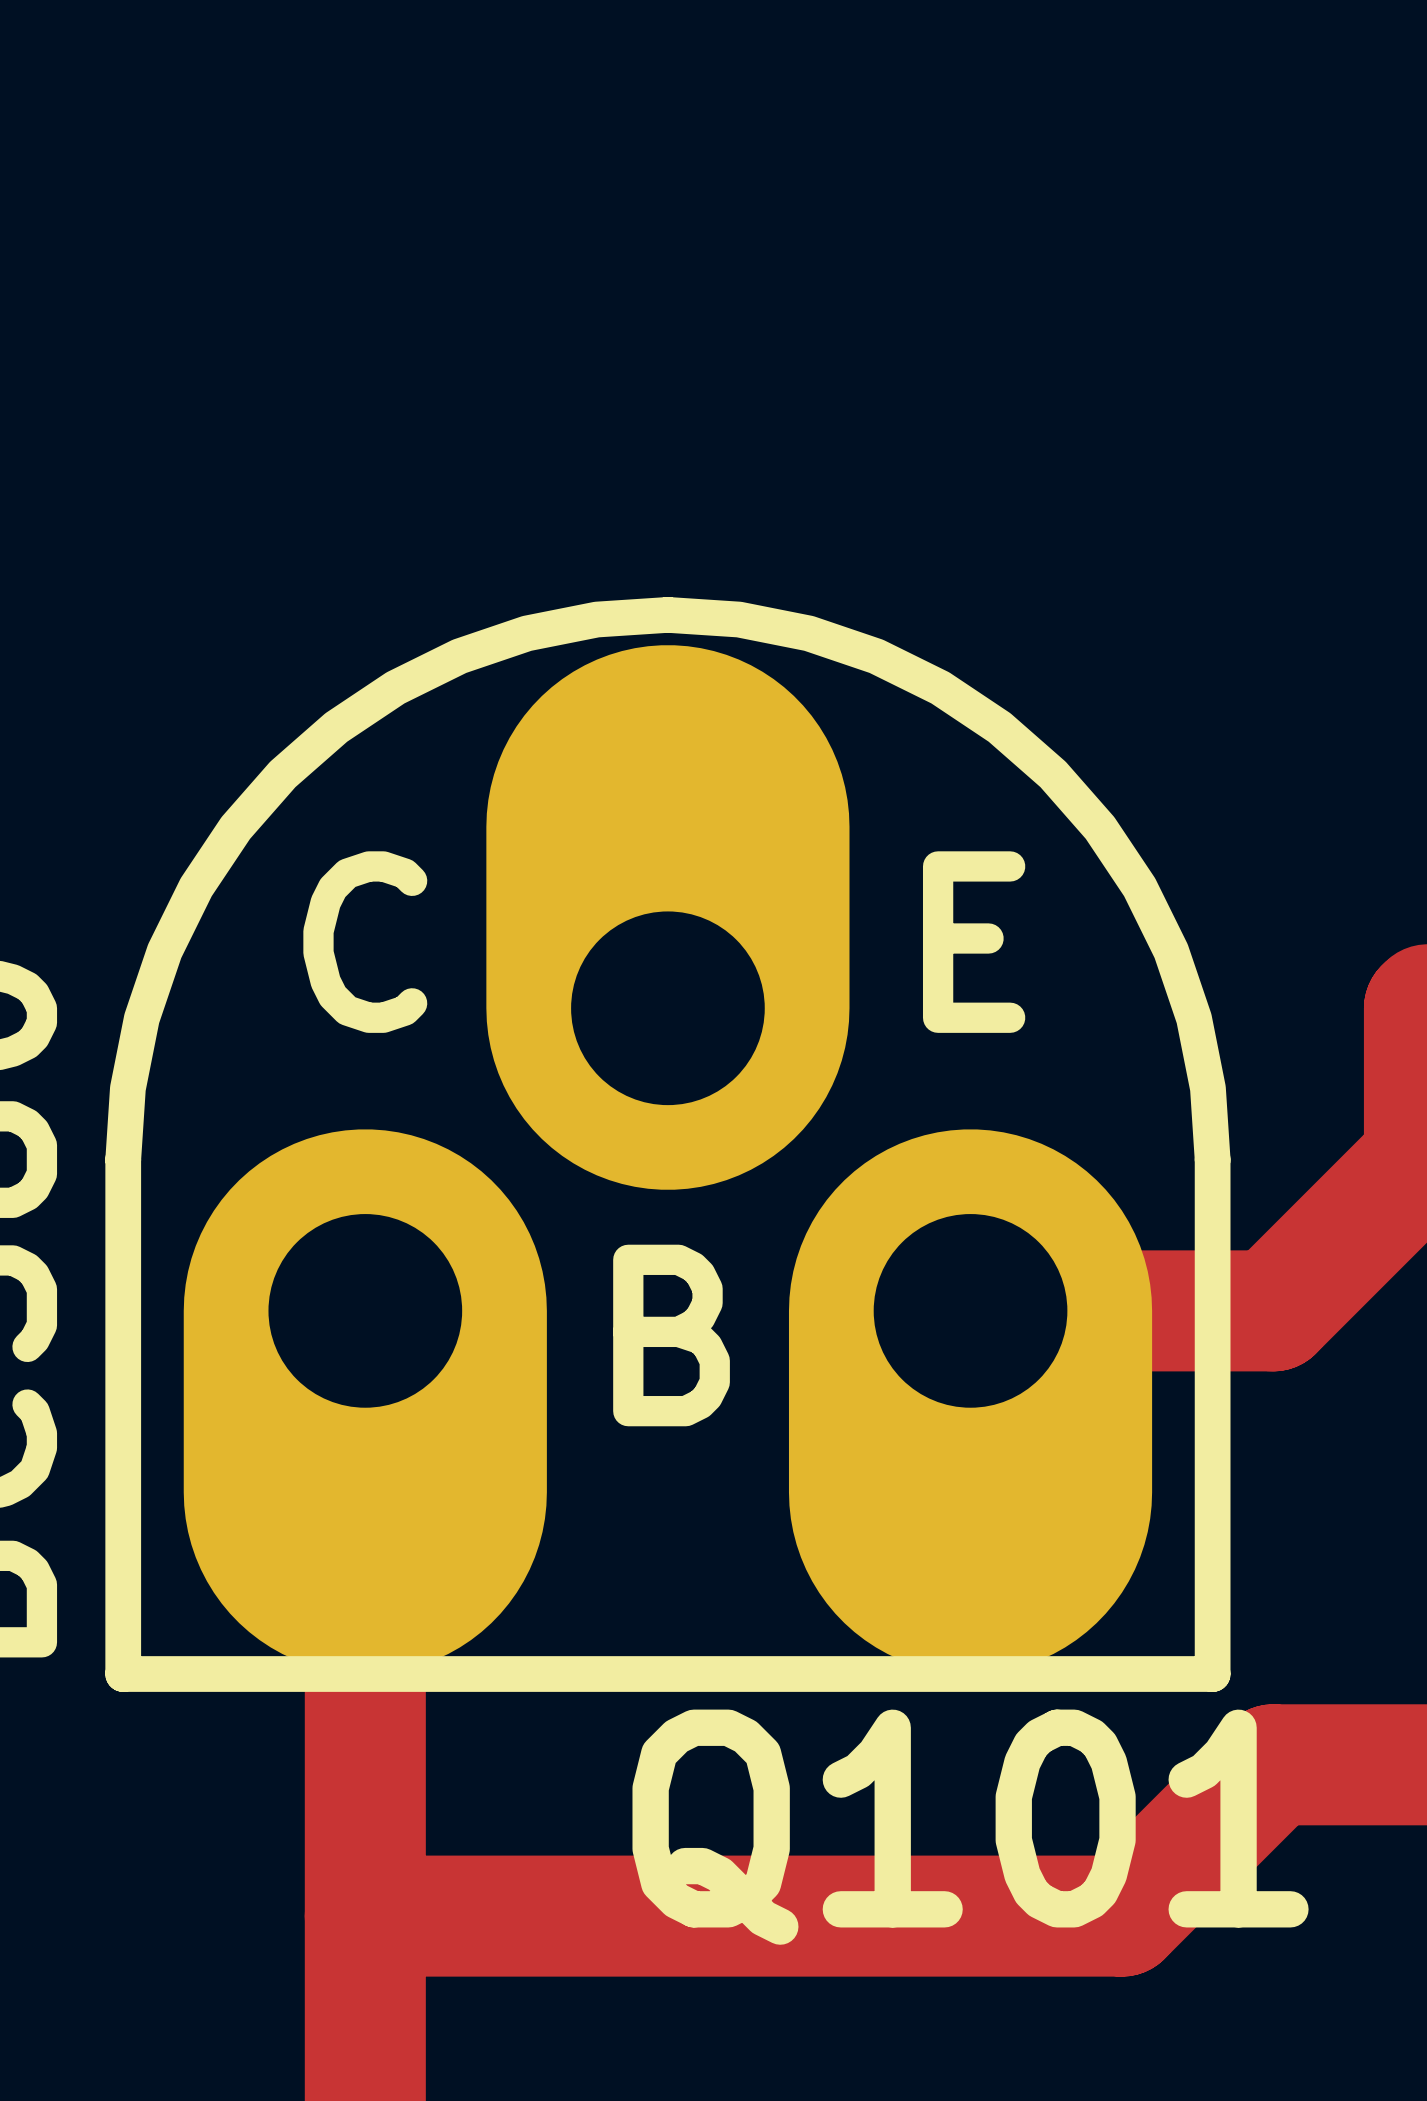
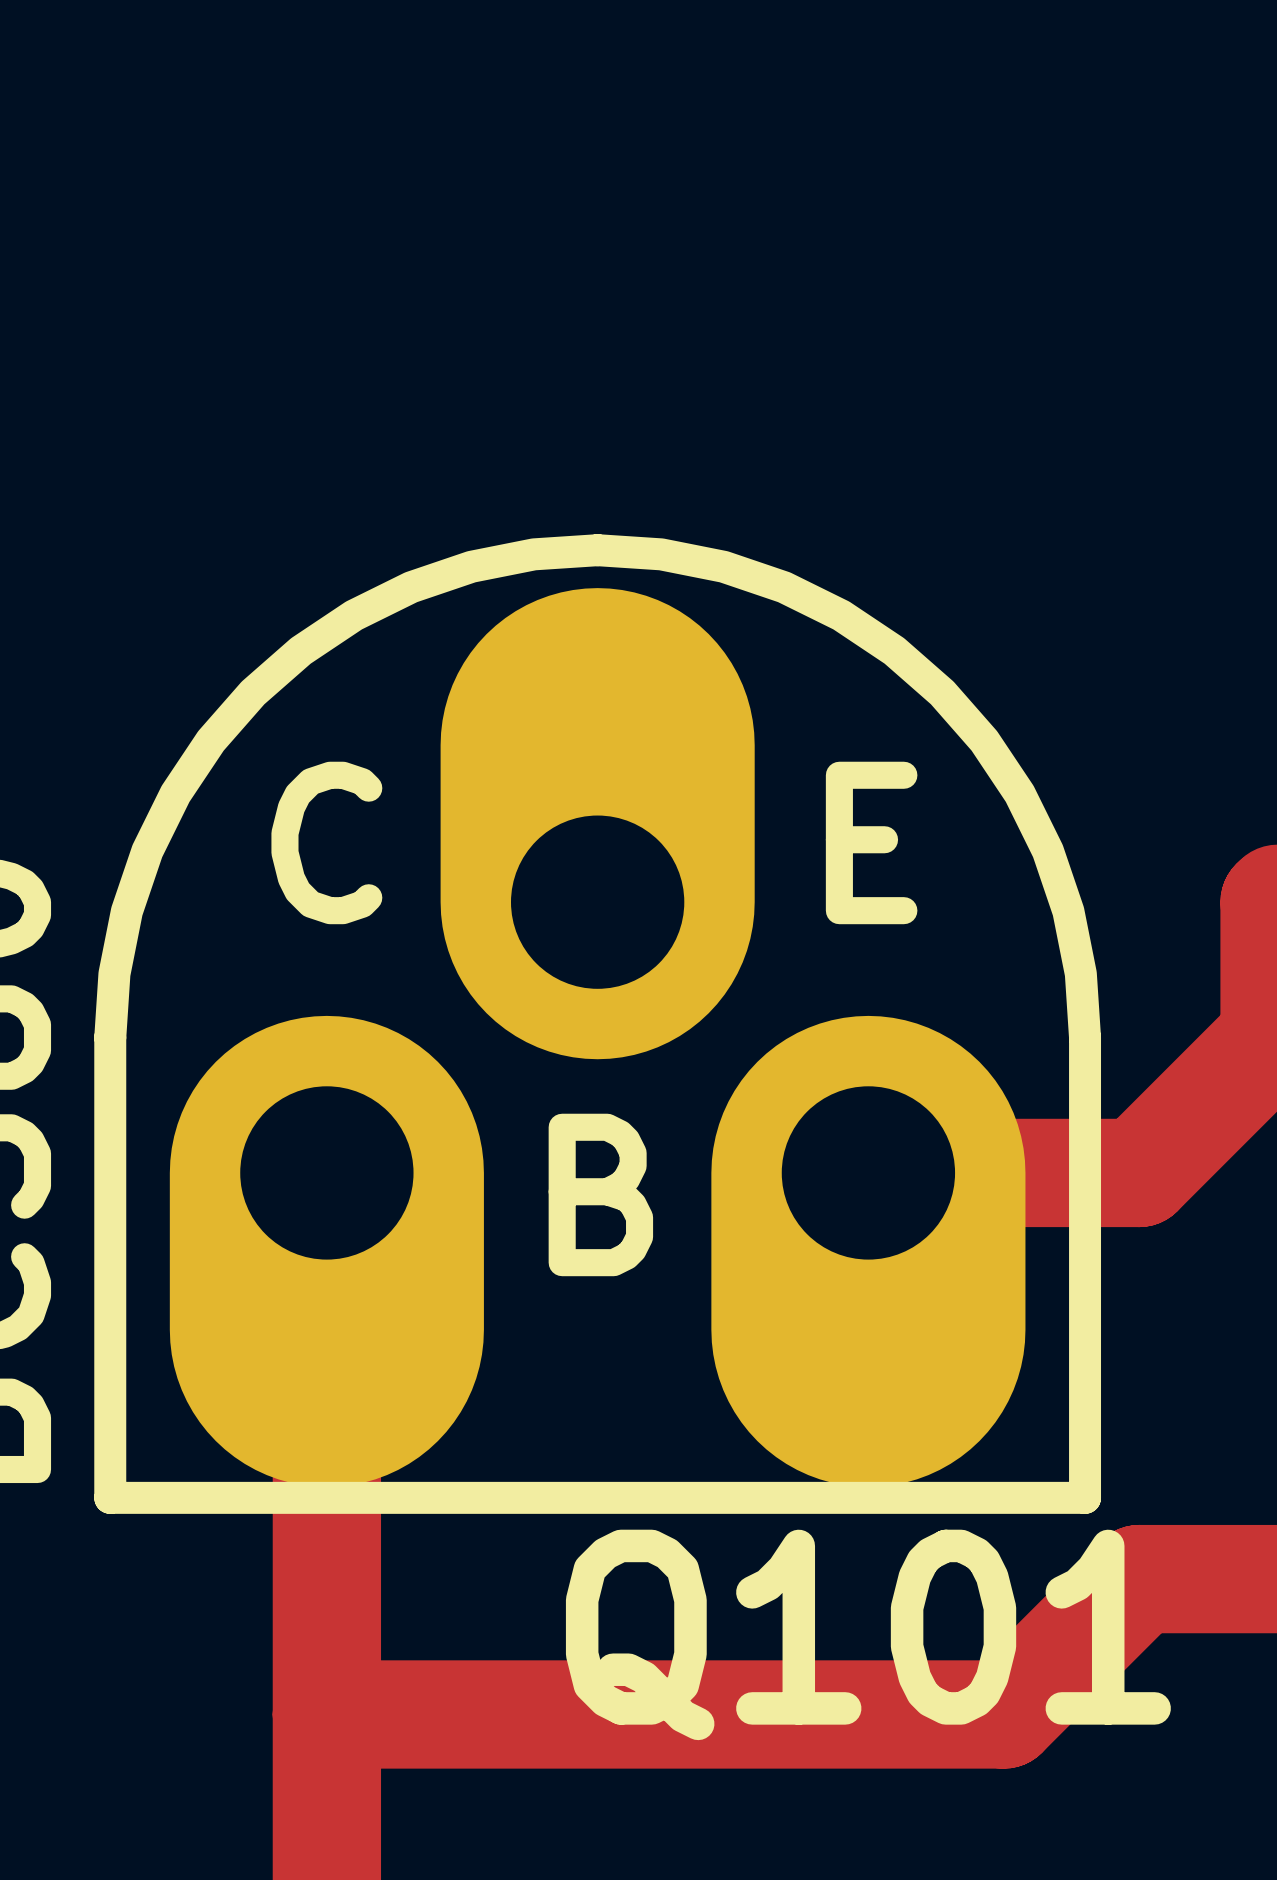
Q101 footprint: [105, 597, 1231, 1692] -> [94, 534, 1102, 1514]

